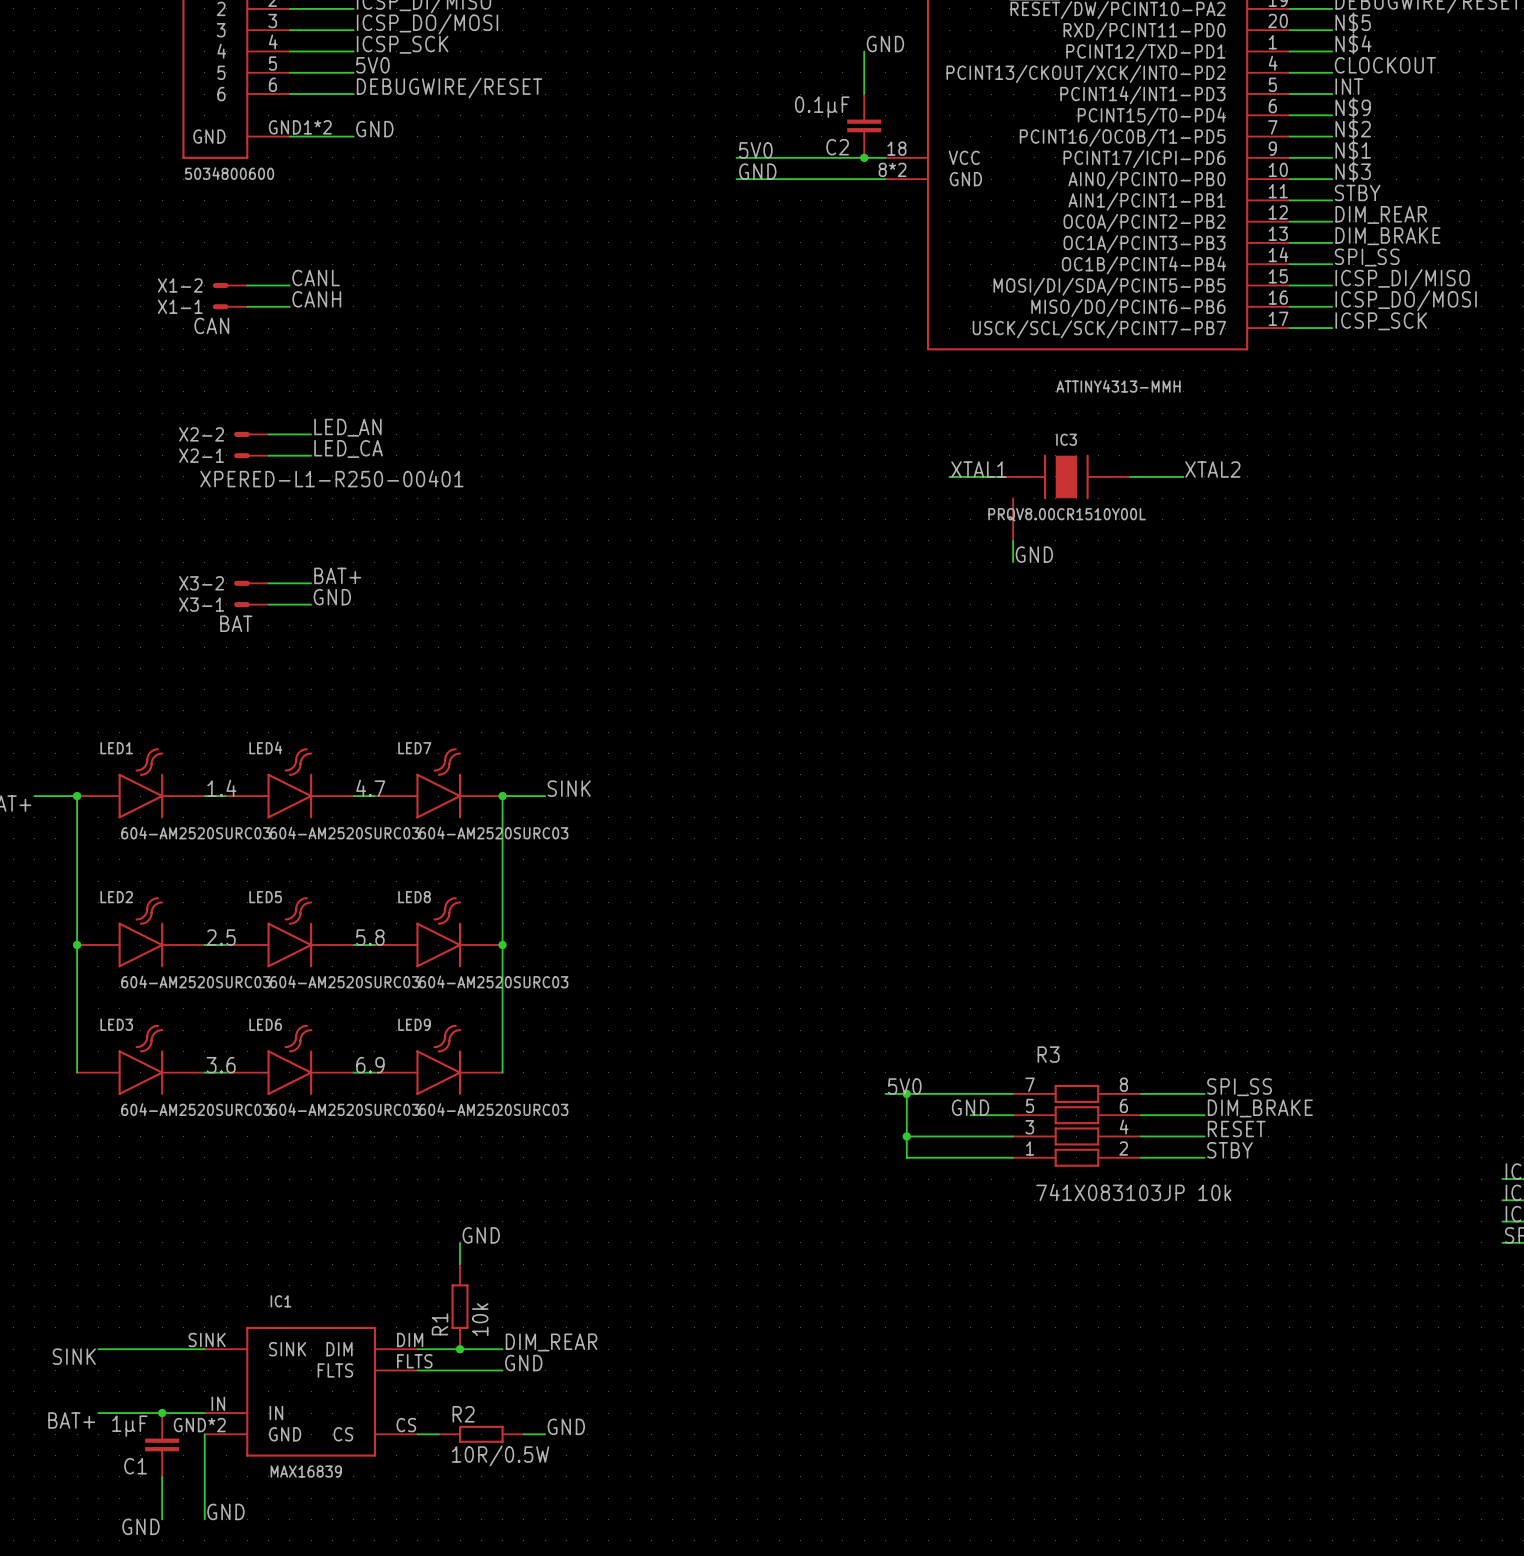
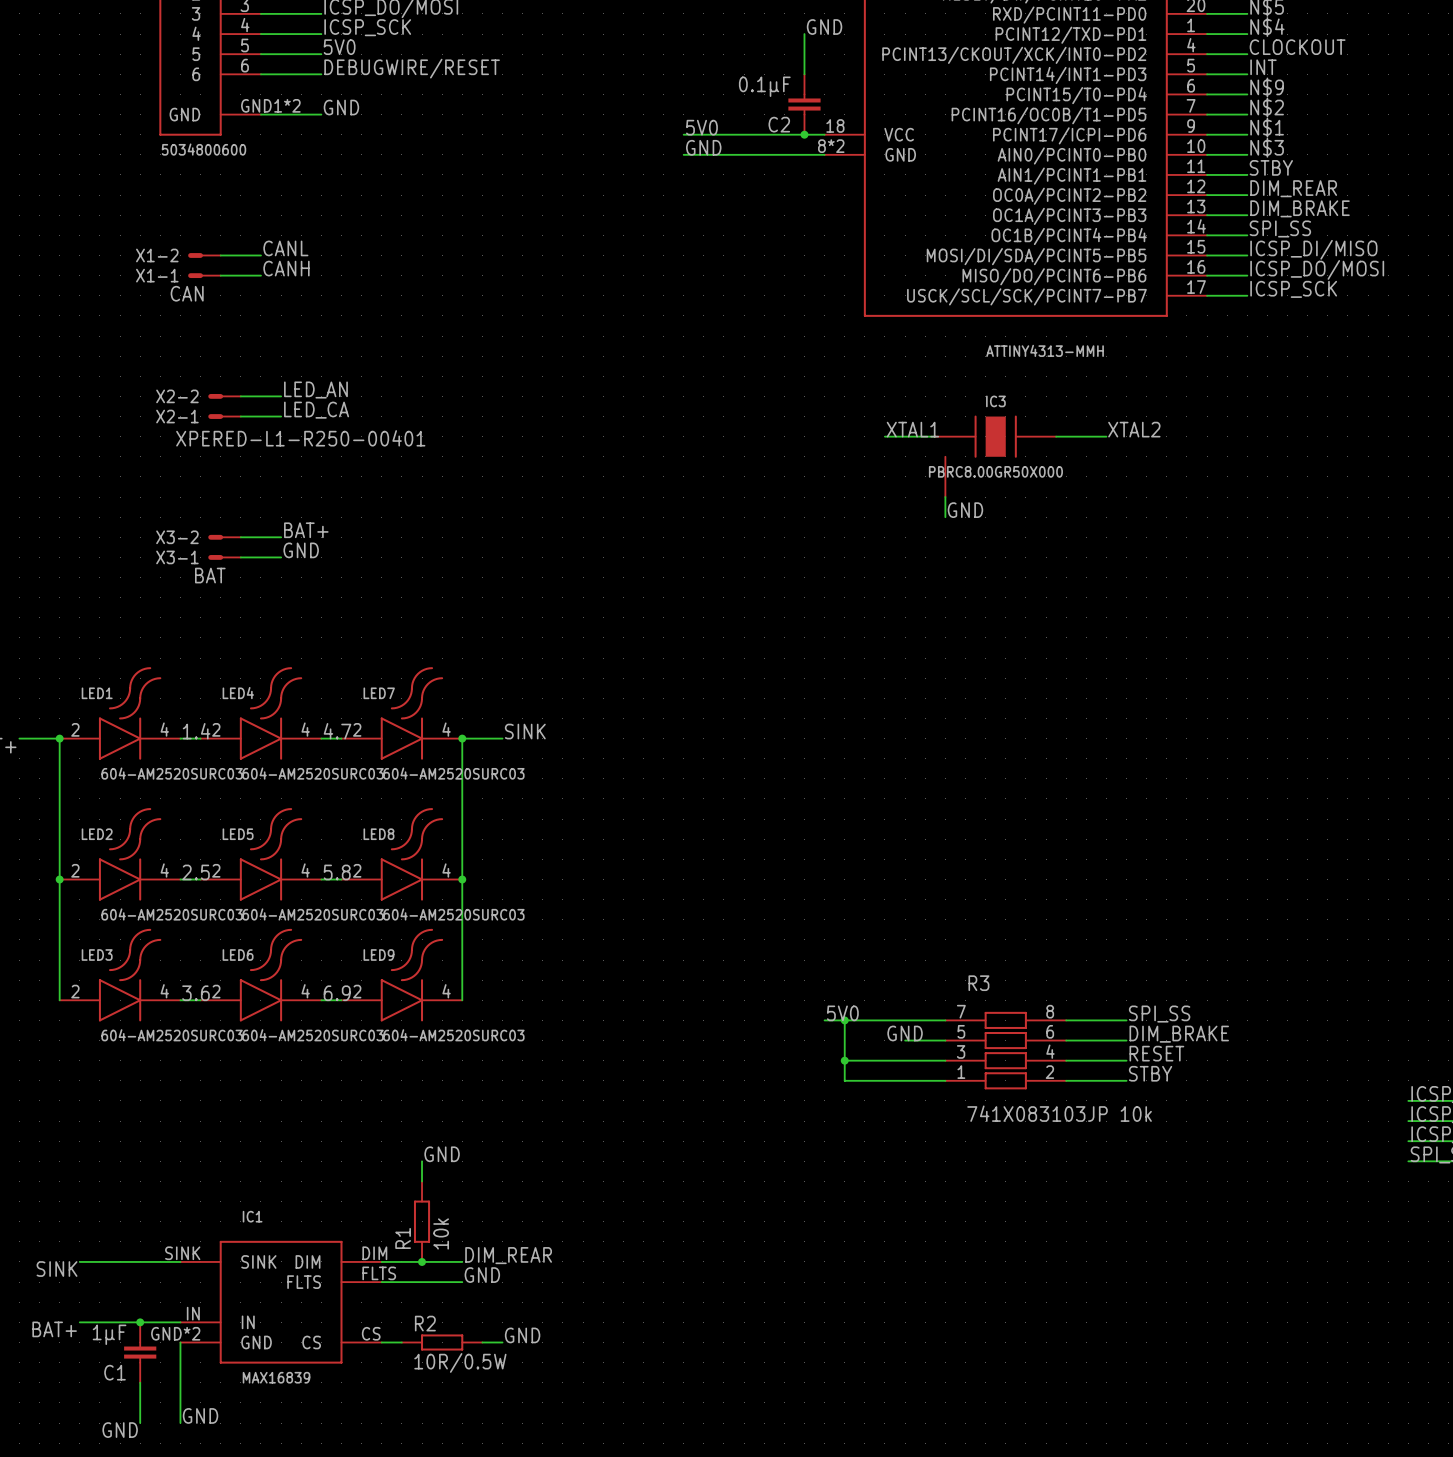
IC3 value: PRQV8.00CR1510Y00L (1067, 514) -> PBRC8.00GR50X000 (995, 471)
LED1 symbol: [77, 748, 205, 819] -> [59, 667, 181, 760]
LED4 symbol: [226, 748, 354, 819] -> [200, 667, 322, 760]
LED7 symbol: [374, 748, 503, 819] -> [341, 667, 463, 760]
LED2 symbol: [77, 897, 205, 968] -> [59, 808, 181, 901]
LED5 symbol: [226, 897, 354, 968] -> [200, 808, 322, 901]
LED8 symbol: [374, 897, 503, 968] -> [341, 808, 463, 901]
LED3 symbol: [77, 1024, 205, 1095] -> [59, 928, 181, 1022]
LED6 symbol: [226, 1024, 354, 1095] -> [200, 928, 322, 1022]
LED9 symbol: [374, 1024, 503, 1095] -> [341, 928, 463, 1022]

